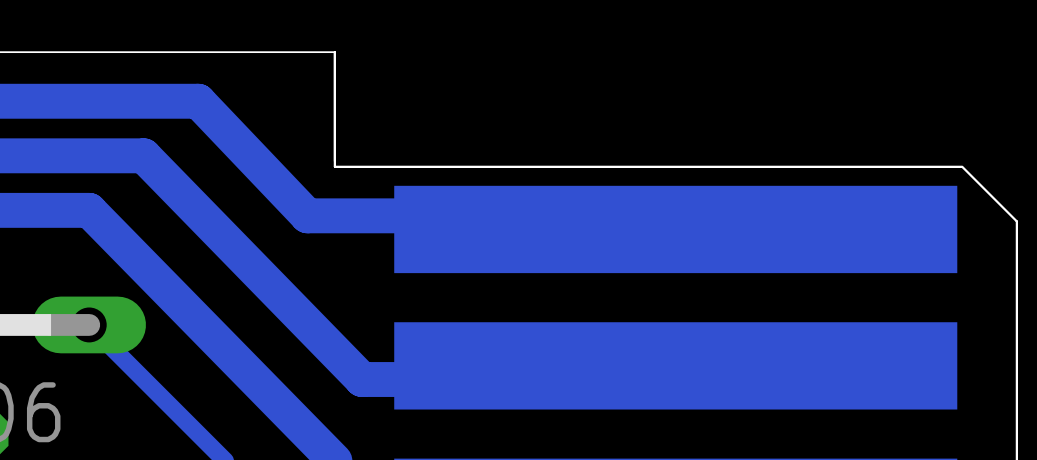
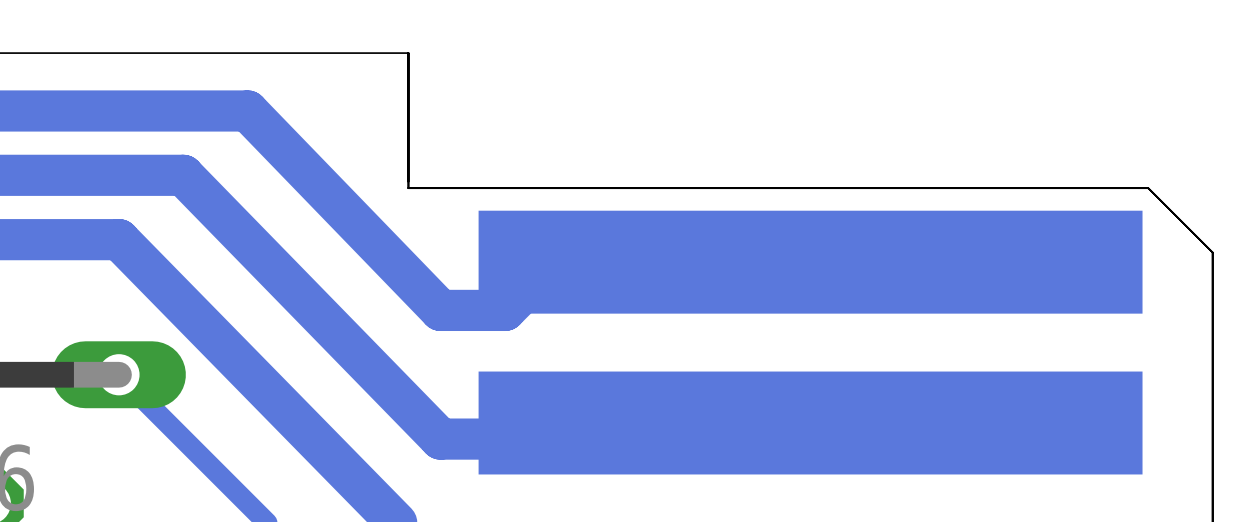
bottom track: (198, 101) (307, 215) (416, 215) (454, 232) -> (247, 110) (440, 310) (504, 310) (549, 265)

